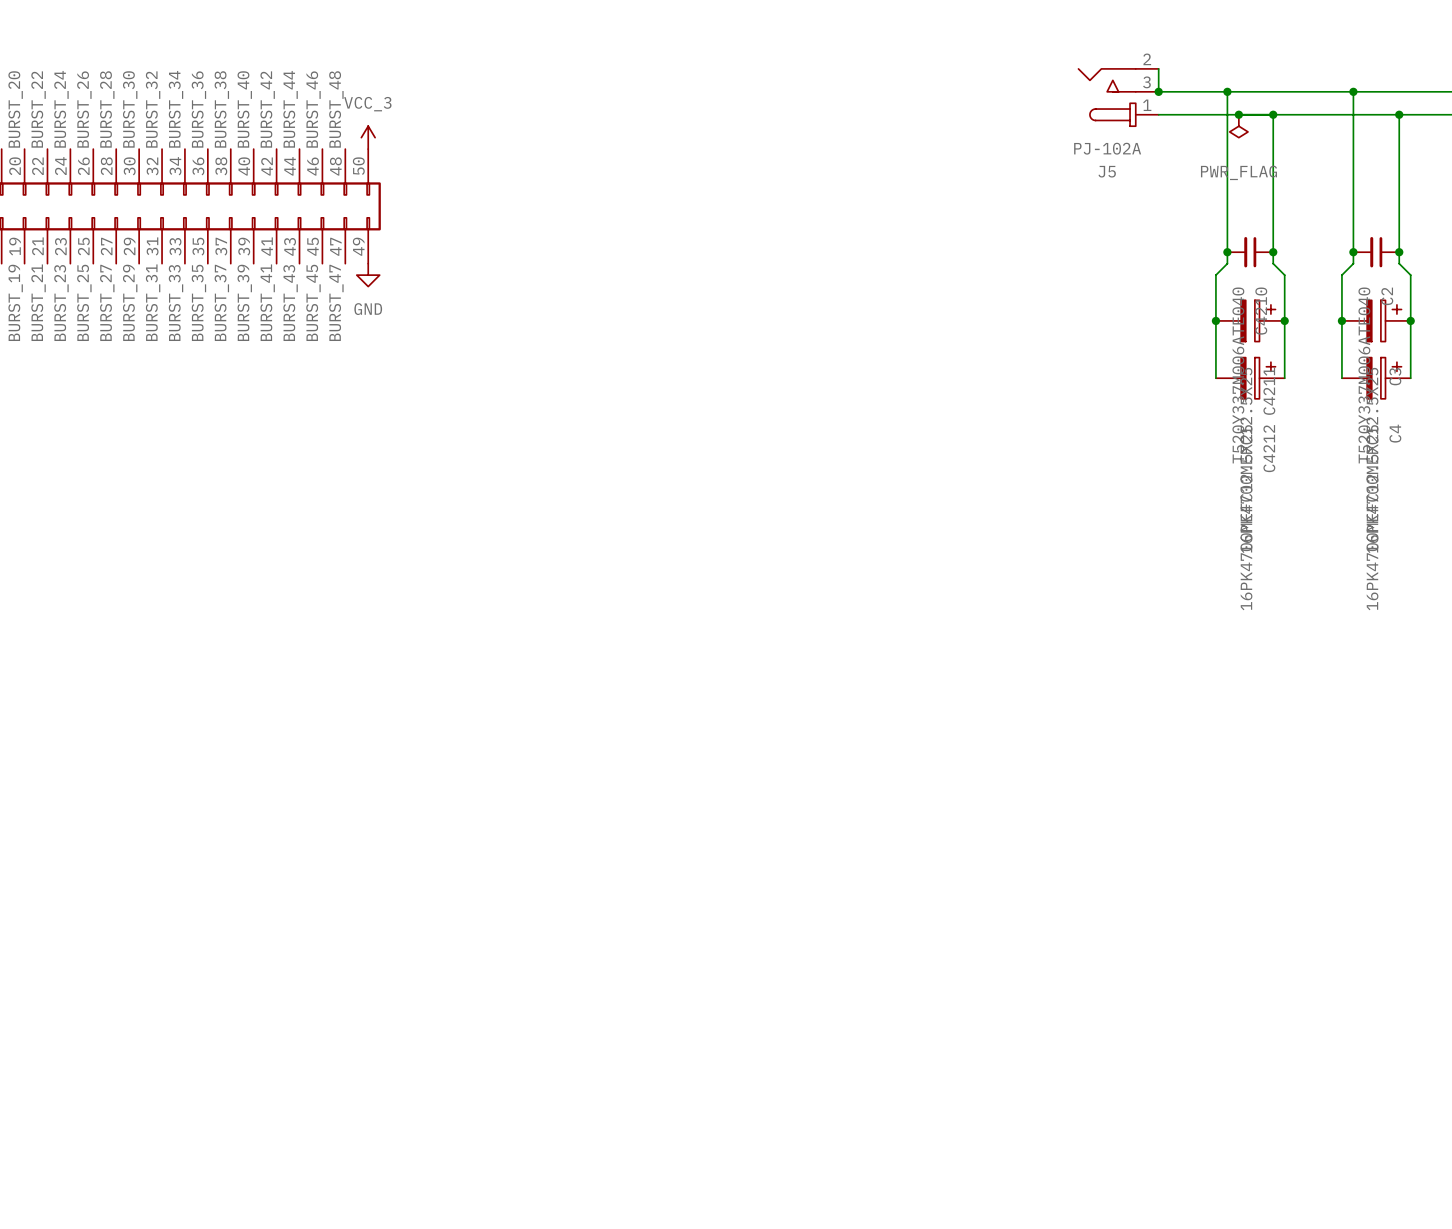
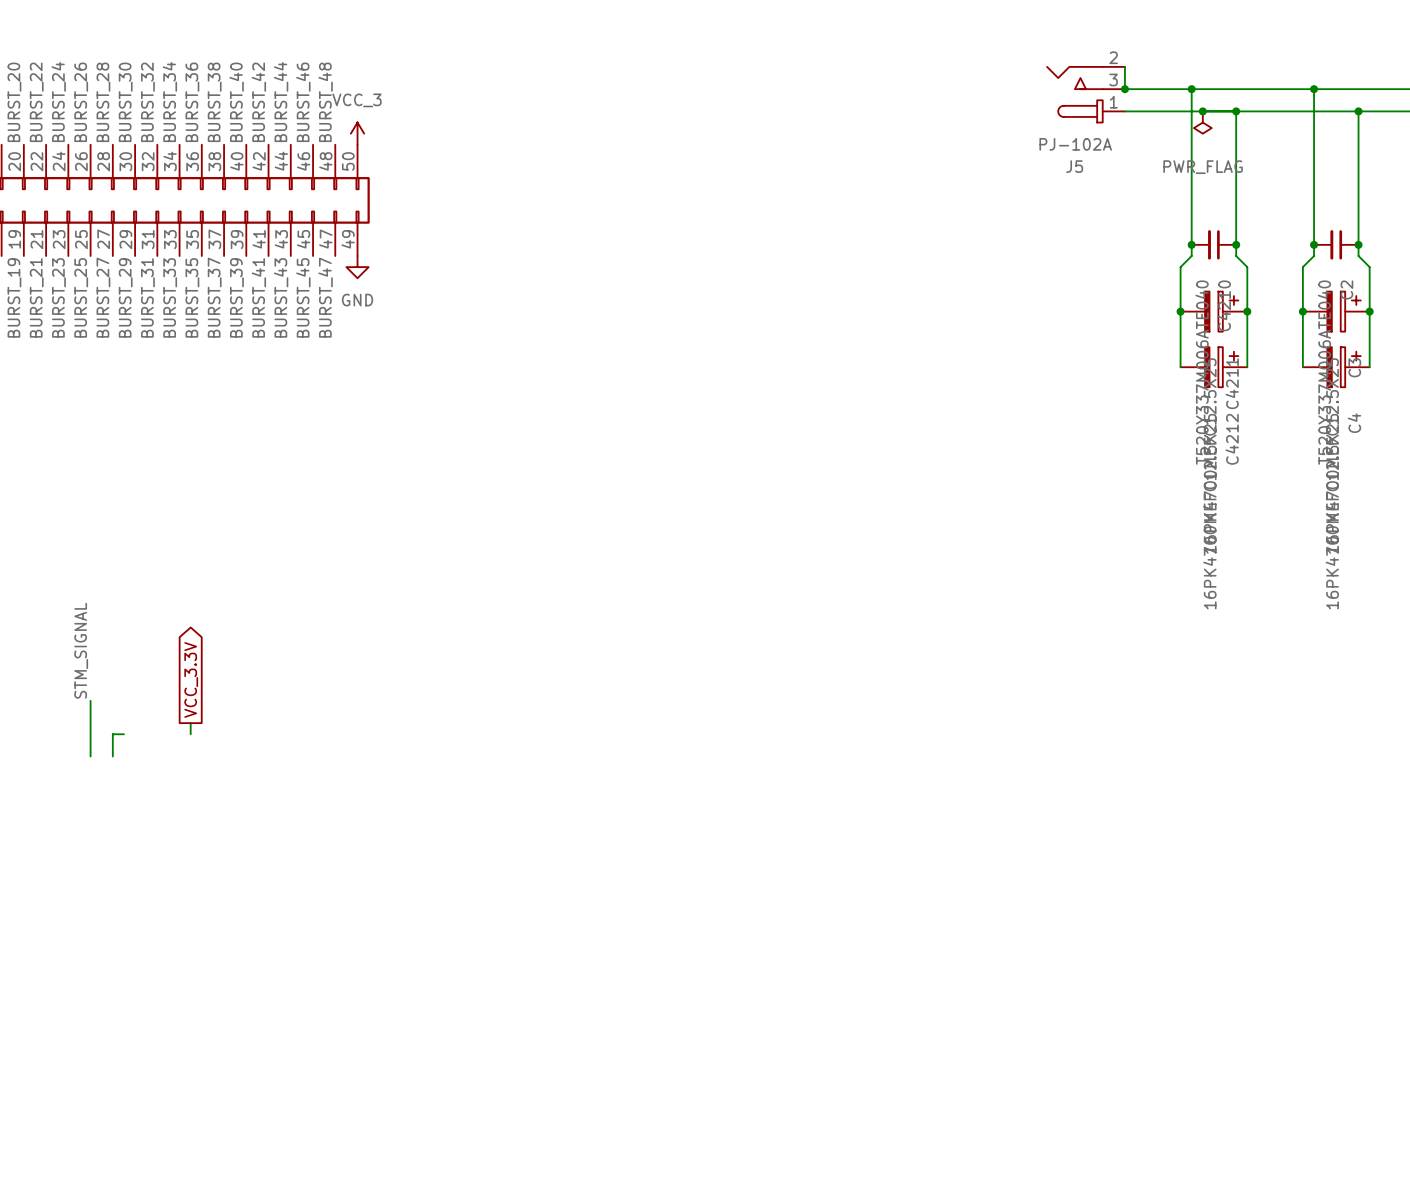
label: none -> STM_SIGNAL (81, 650)
global label: none -> VCC_3.3V (191, 679)
wire: none -> (90, 700) (90, 756)
wire: none -> (190, 723) (190, 734)
wire: none -> (123, 734) (112, 734) (112, 756)

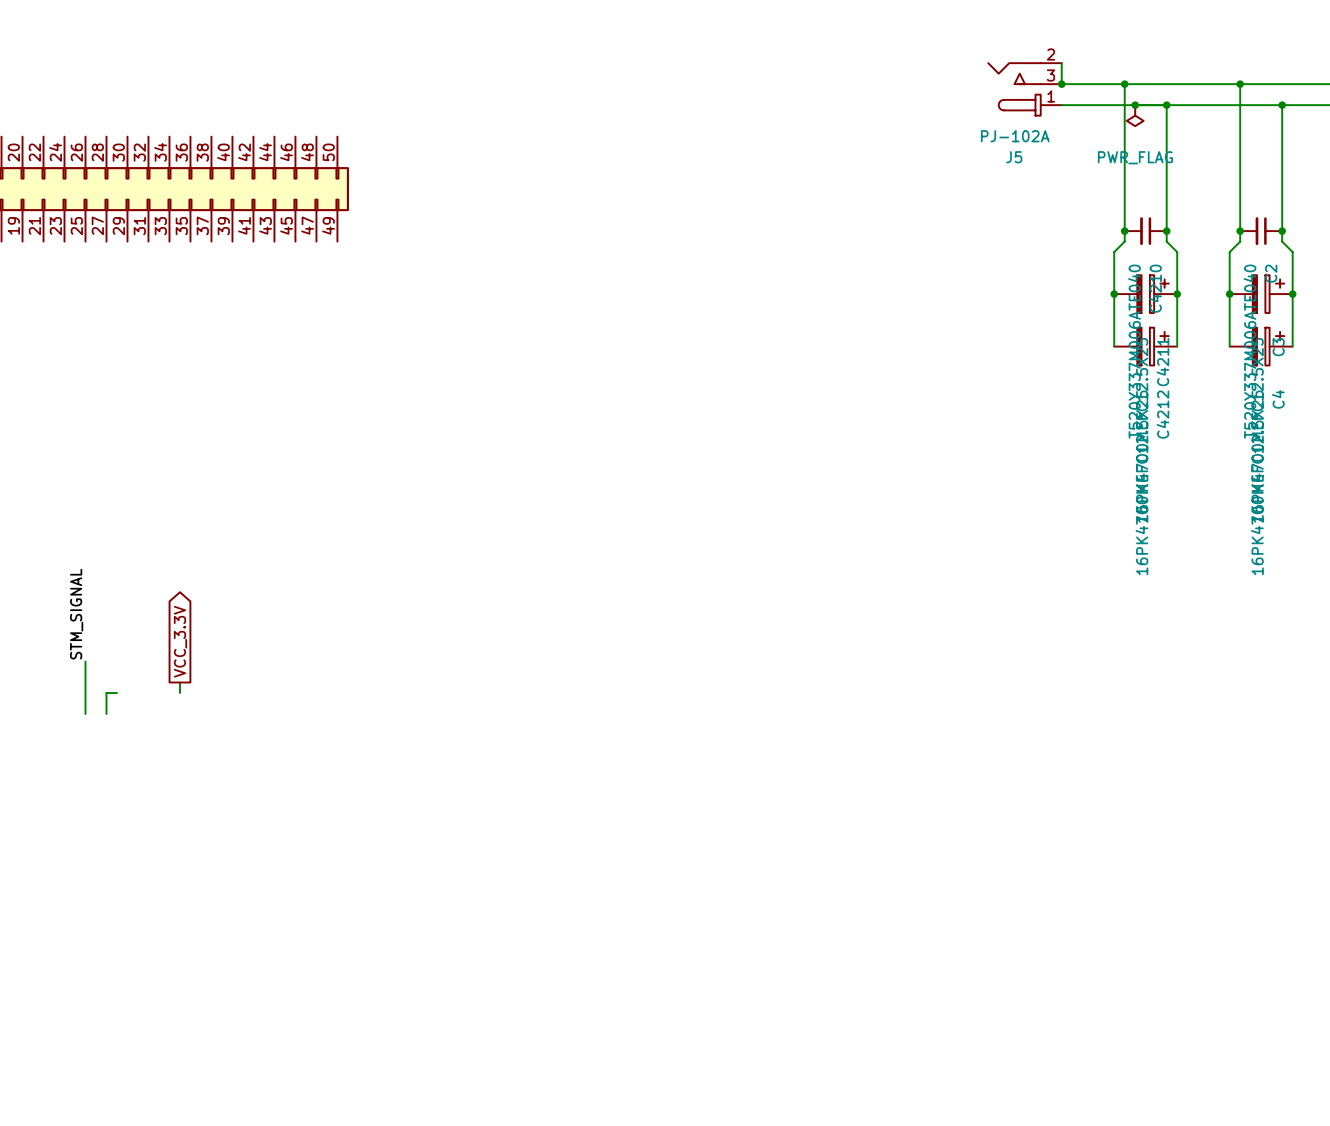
label: BURST_20 (14, 102) -> none
label: BURST_22 (36, 102) -> none
label: BURST_24 (58, 102) -> none
label: BURST_26 (81, 102) -> none
label: BURST_28 (103, 102) -> none
label: BURST_30 (125, 102) -> none
label: BURST_32 (147, 102) -> none
label: BURST_34 (169, 102) -> none
label: BURST_36 (192, 102) -> none
label: BURST_38 (214, 102) -> none
label: BURST_40 (236, 102) -> none
label: BURST_42 (258, 102) -> none
label: BURST_44 (281, 102) -> none
label: BURST_46 (303, 102) -> none
label: BURST_48 (325, 102) -> none
power symbol: VCC_3 (357, 133) -> none
power symbol: GND (357, 267) -> none
label: BURST_19 (14, 297) -> none
label: BURST_21 (36, 297) -> none
label: BURST_23 (58, 297) -> none
label: BURST_25 (81, 297) -> none
label: BURST_27 (103, 297) -> none
label: BURST_29 (125, 297) -> none
label: BURST_31 (147, 297) -> none
label: BURST_33 (170, 297) -> none
label: BURST_35 (192, 297) -> none
label: BURST_37 (214, 297) -> none
label: BURST_39 (236, 297) -> none
label: BURST_41 (258, 297) -> none
label: BURST_43 (281, 297) -> none
label: BURST_45 (303, 297) -> none
label: BURST_47 (325, 297) -> none

